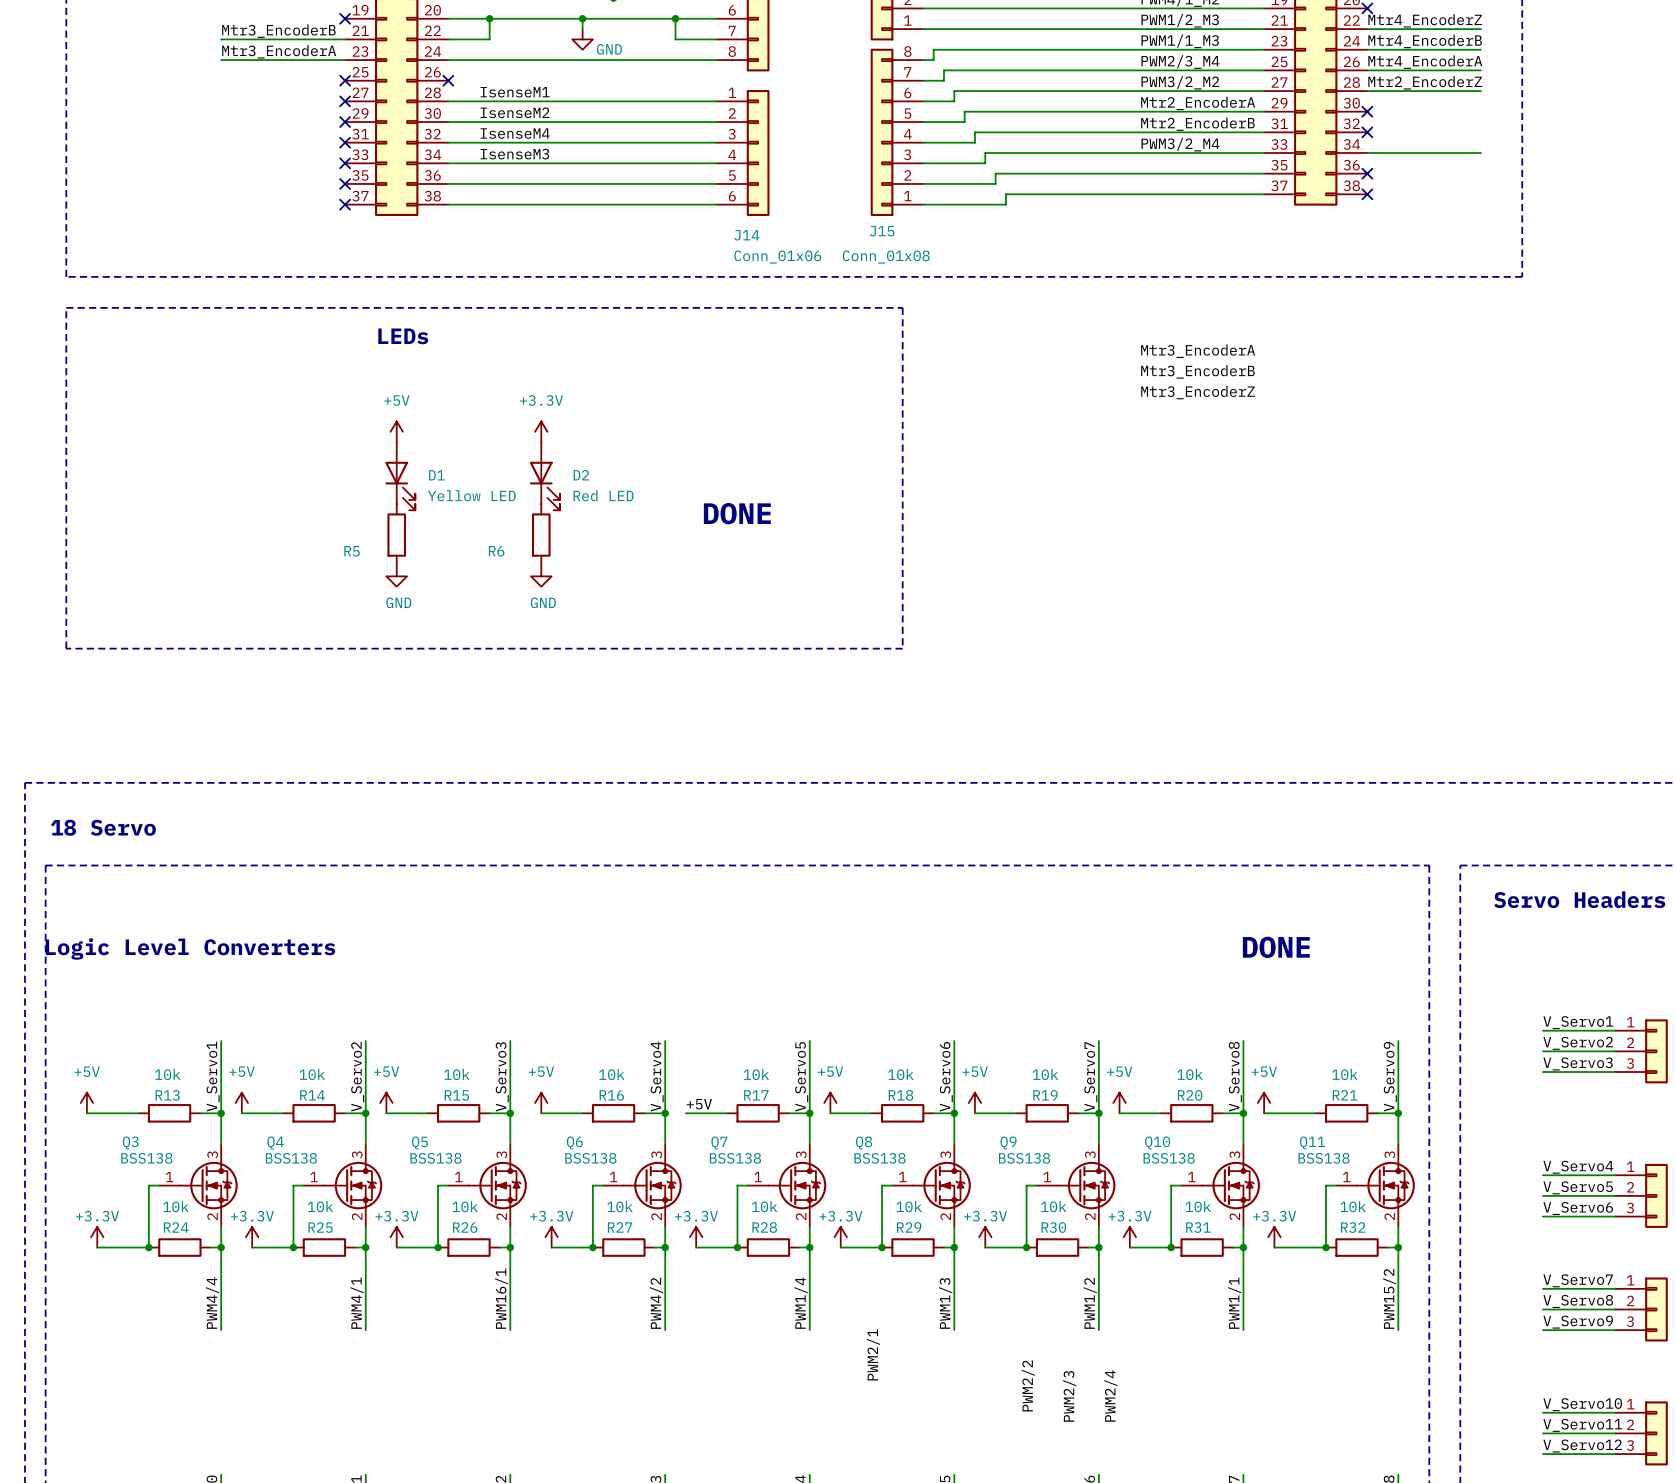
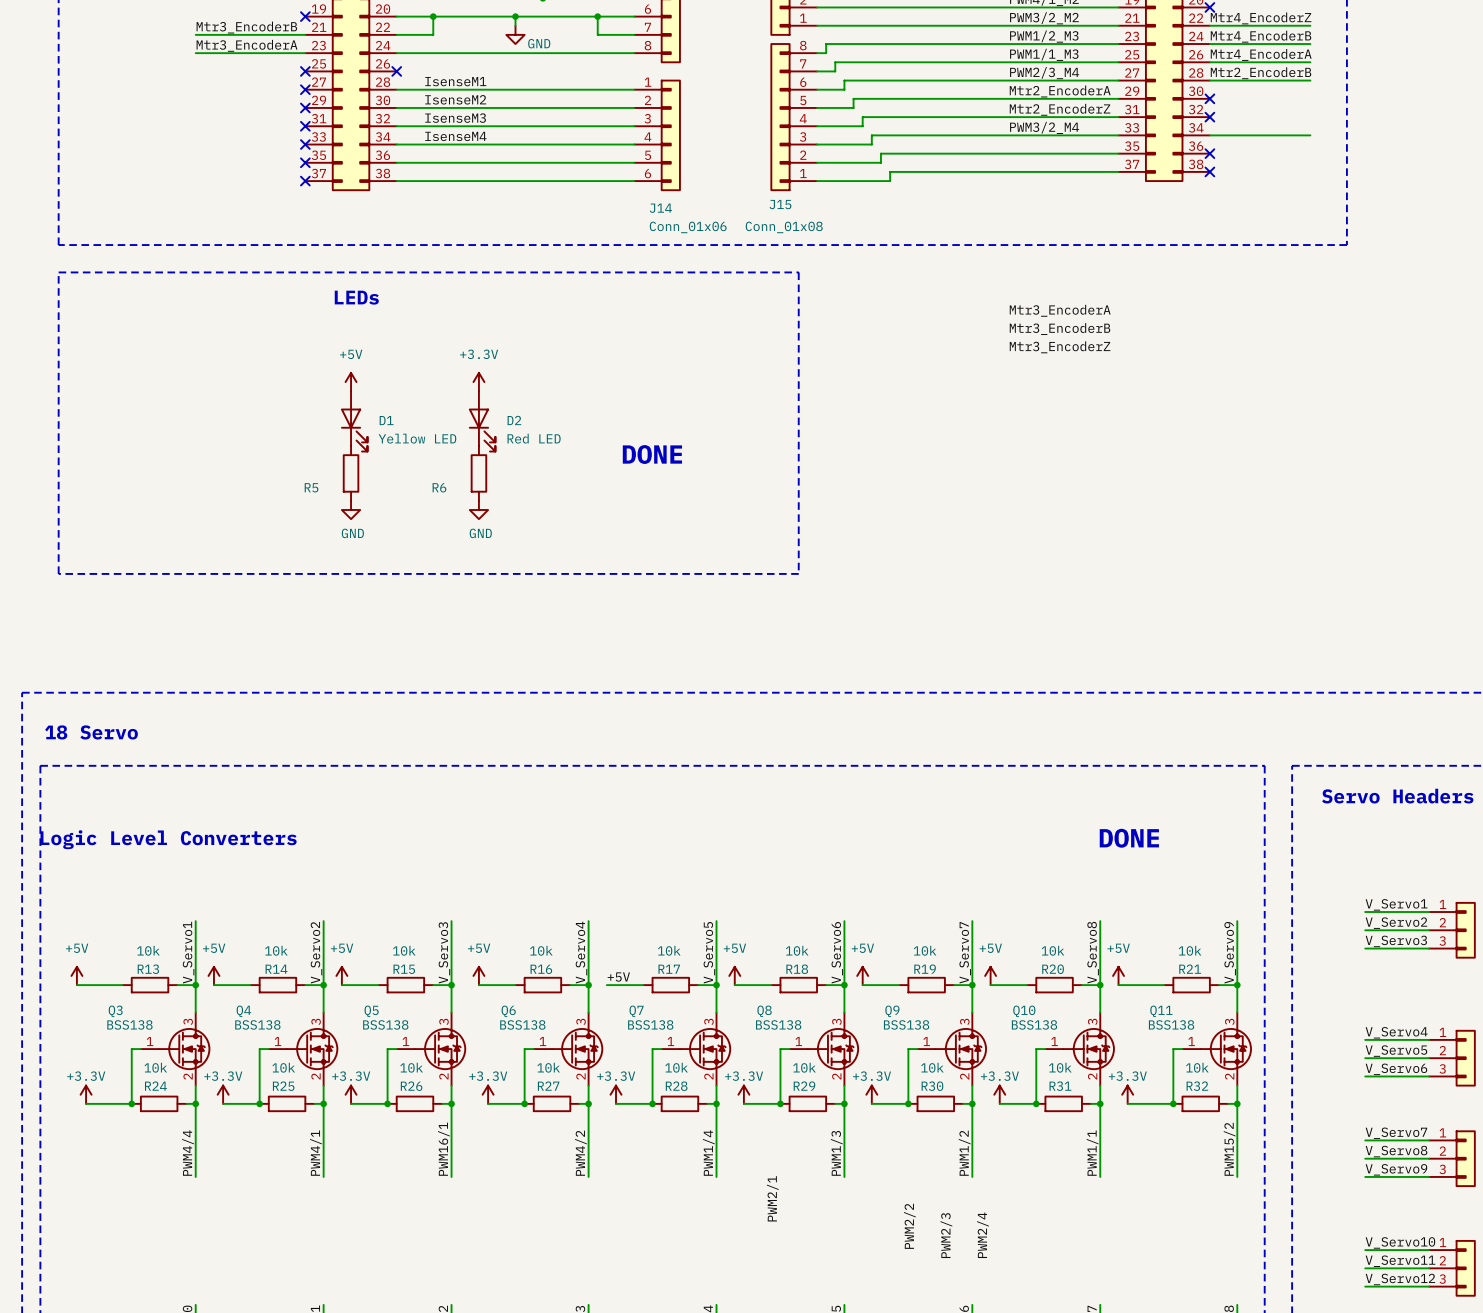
label: PWM1/2_M3 (1180, 20) -> PWM3/2_M2 (1044, 18)
label: PWM1/1_M3 (1180, 41) -> PWM1/2_M3 (1044, 36)
label: PWM2/3_M4 (1180, 61) -> PWM1/1_M3 (1044, 54)
label: PWM3/2_M2 (1180, 82) -> PWM2/3_M4 (1044, 73)
label: Mtr2_EncoderZ (1425, 82) -> Mtr2_EncoderB (1261, 73)
label: Mtr2_EncoderB (1197, 124) -> Mtr2_EncoderZ (1060, 109)
label: IsenseM4 (515, 133) -> IsenseM3 (455, 118)
label: IsenseM3 (514, 154) -> IsenseM4 (455, 136)

